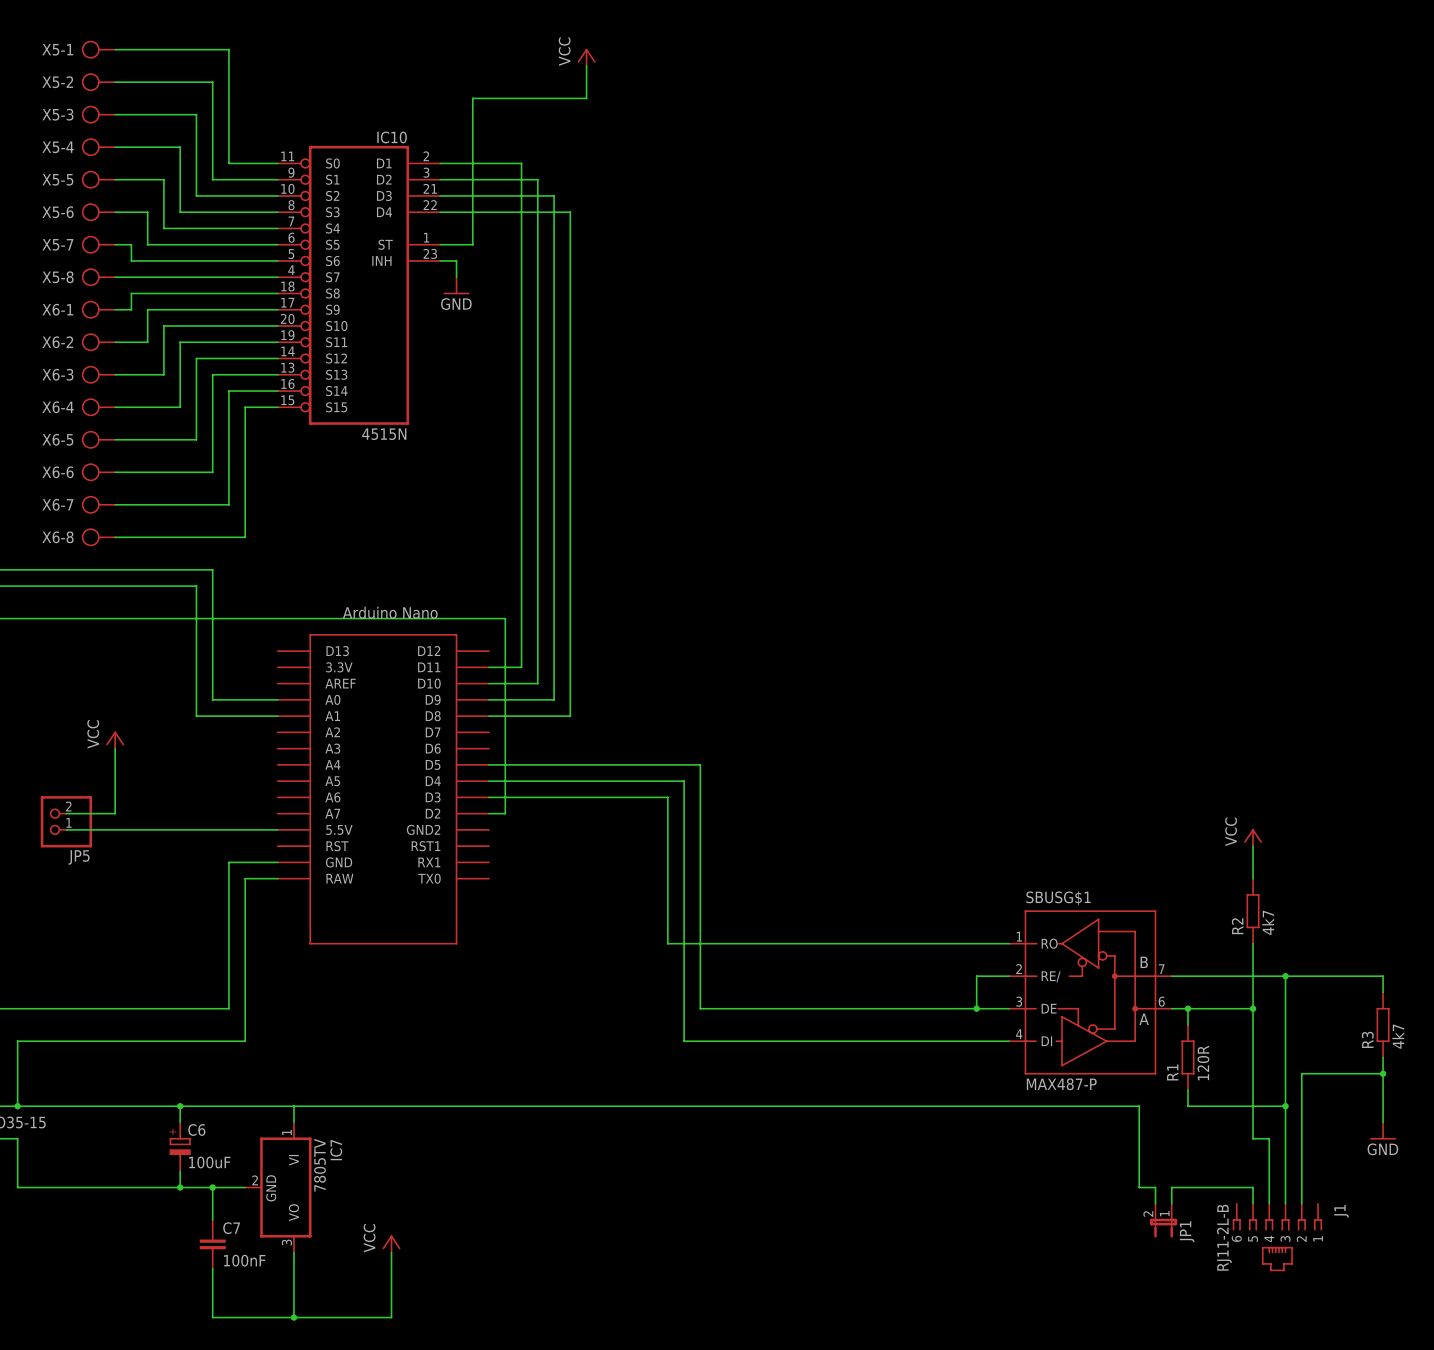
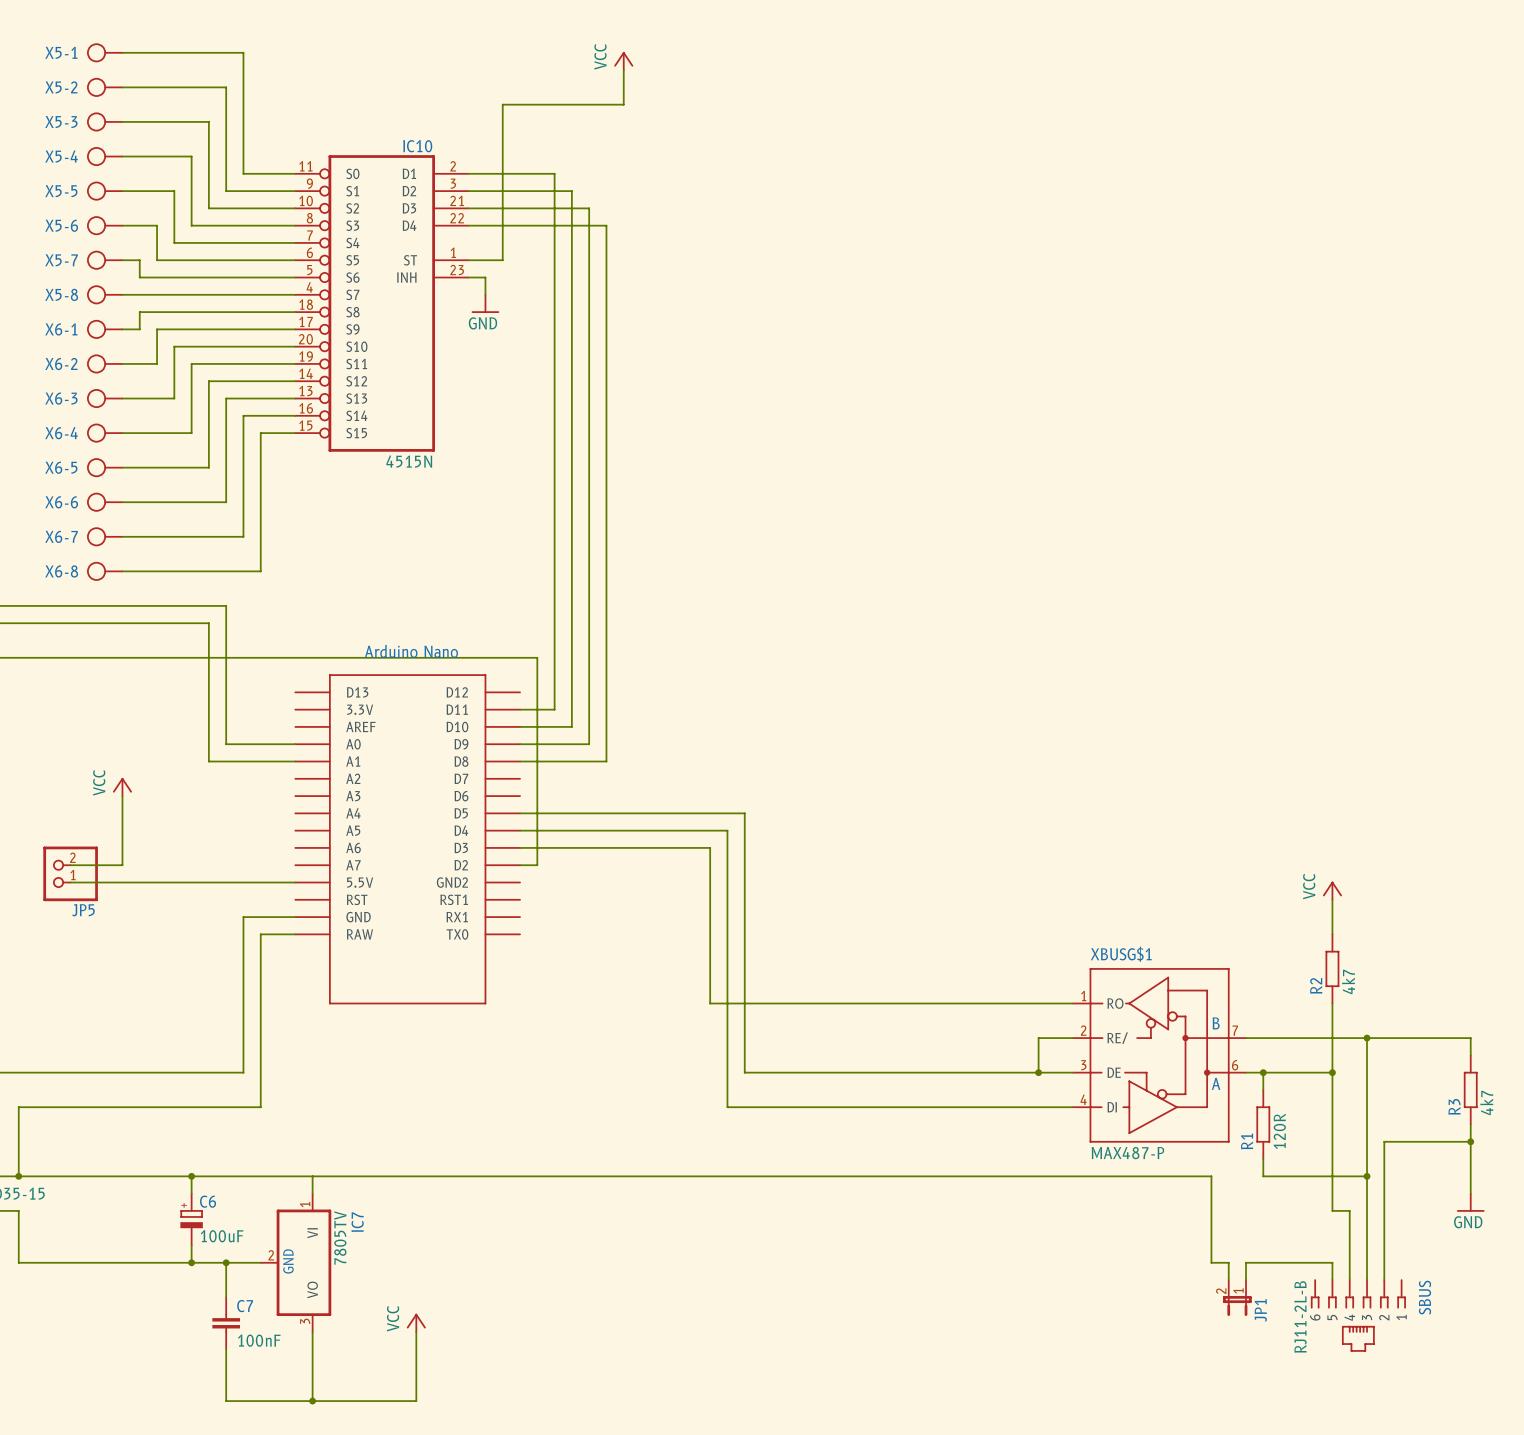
SBUSG$1 name: SBUSG$1 (1058, 898) -> XBUSG$1 (1121, 954)
J1 name: J1 (1341, 1211) -> SBUS (1424, 1297)

